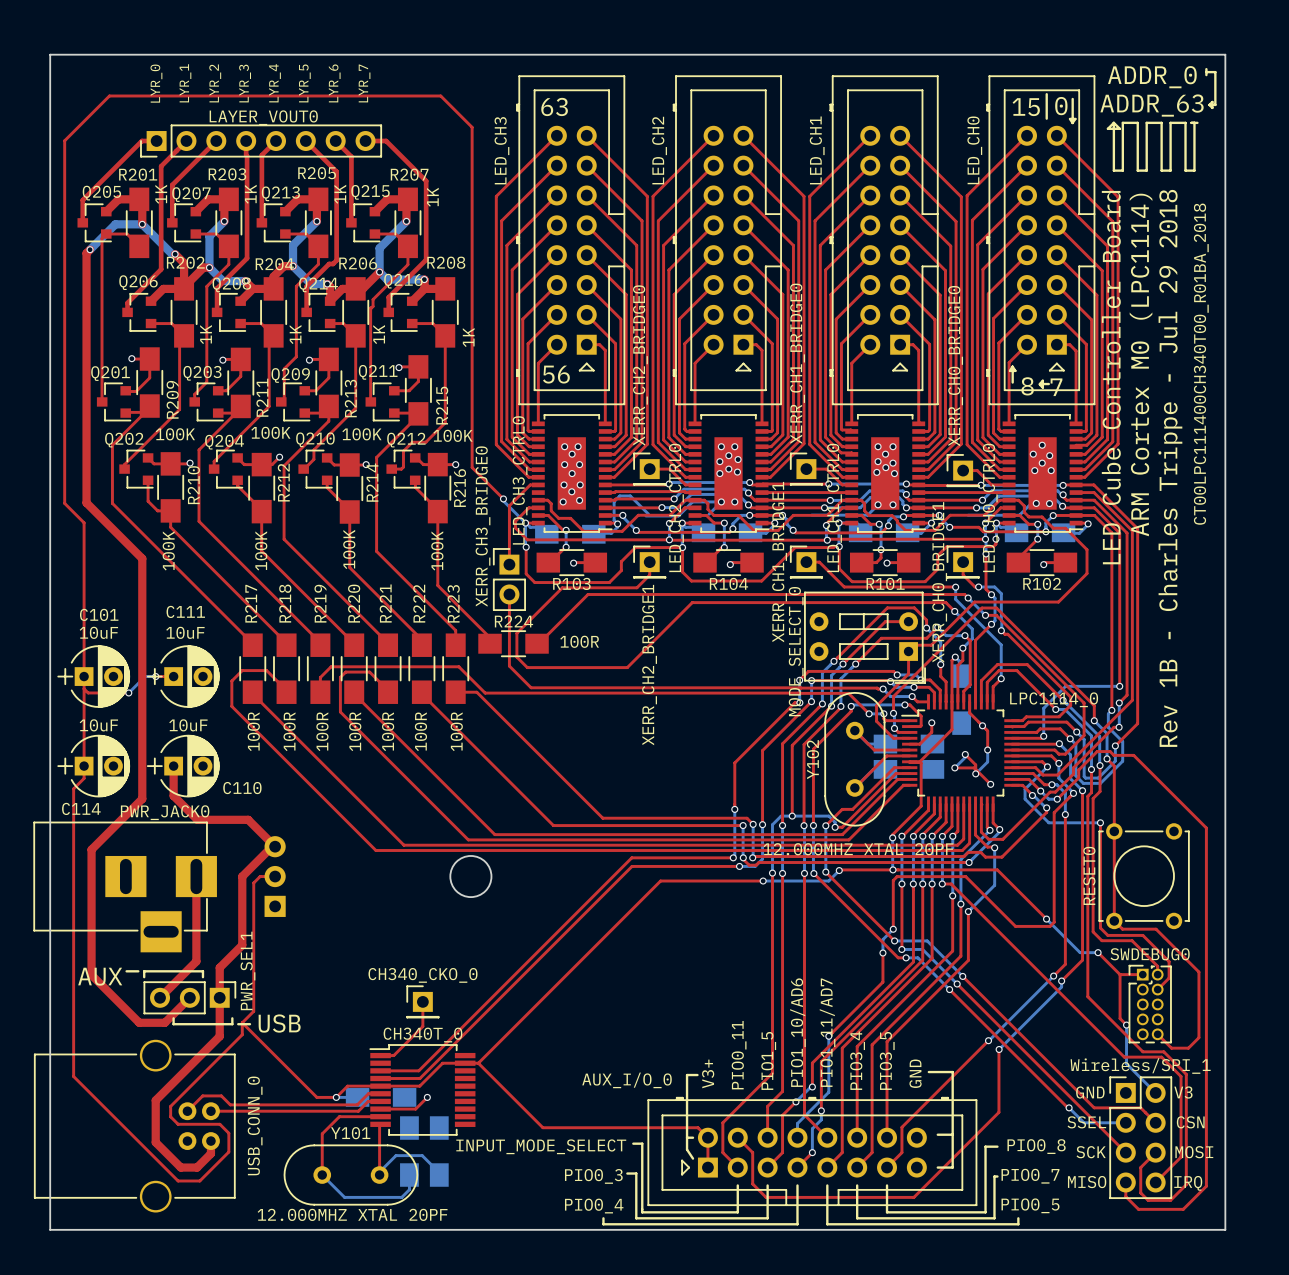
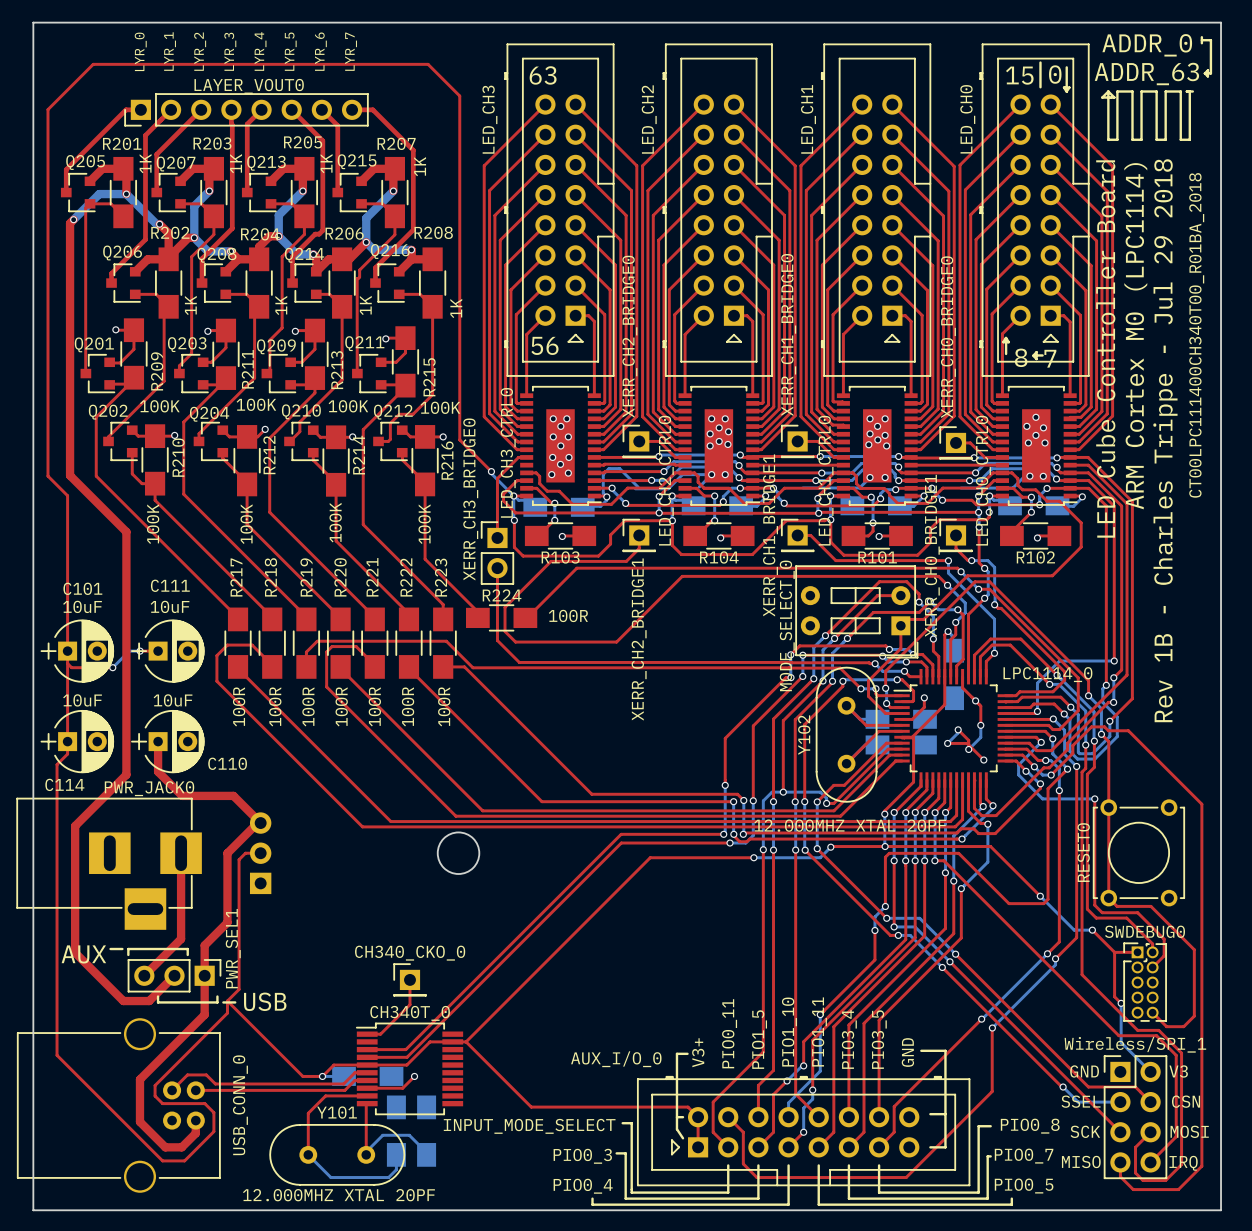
text: PIO1_10/AD6 (797, 1032) -> PIO1_10 (789, 1032)
text: PIO1_11/AD7 (827, 1032) -> PIO1_11 (819, 1031)

